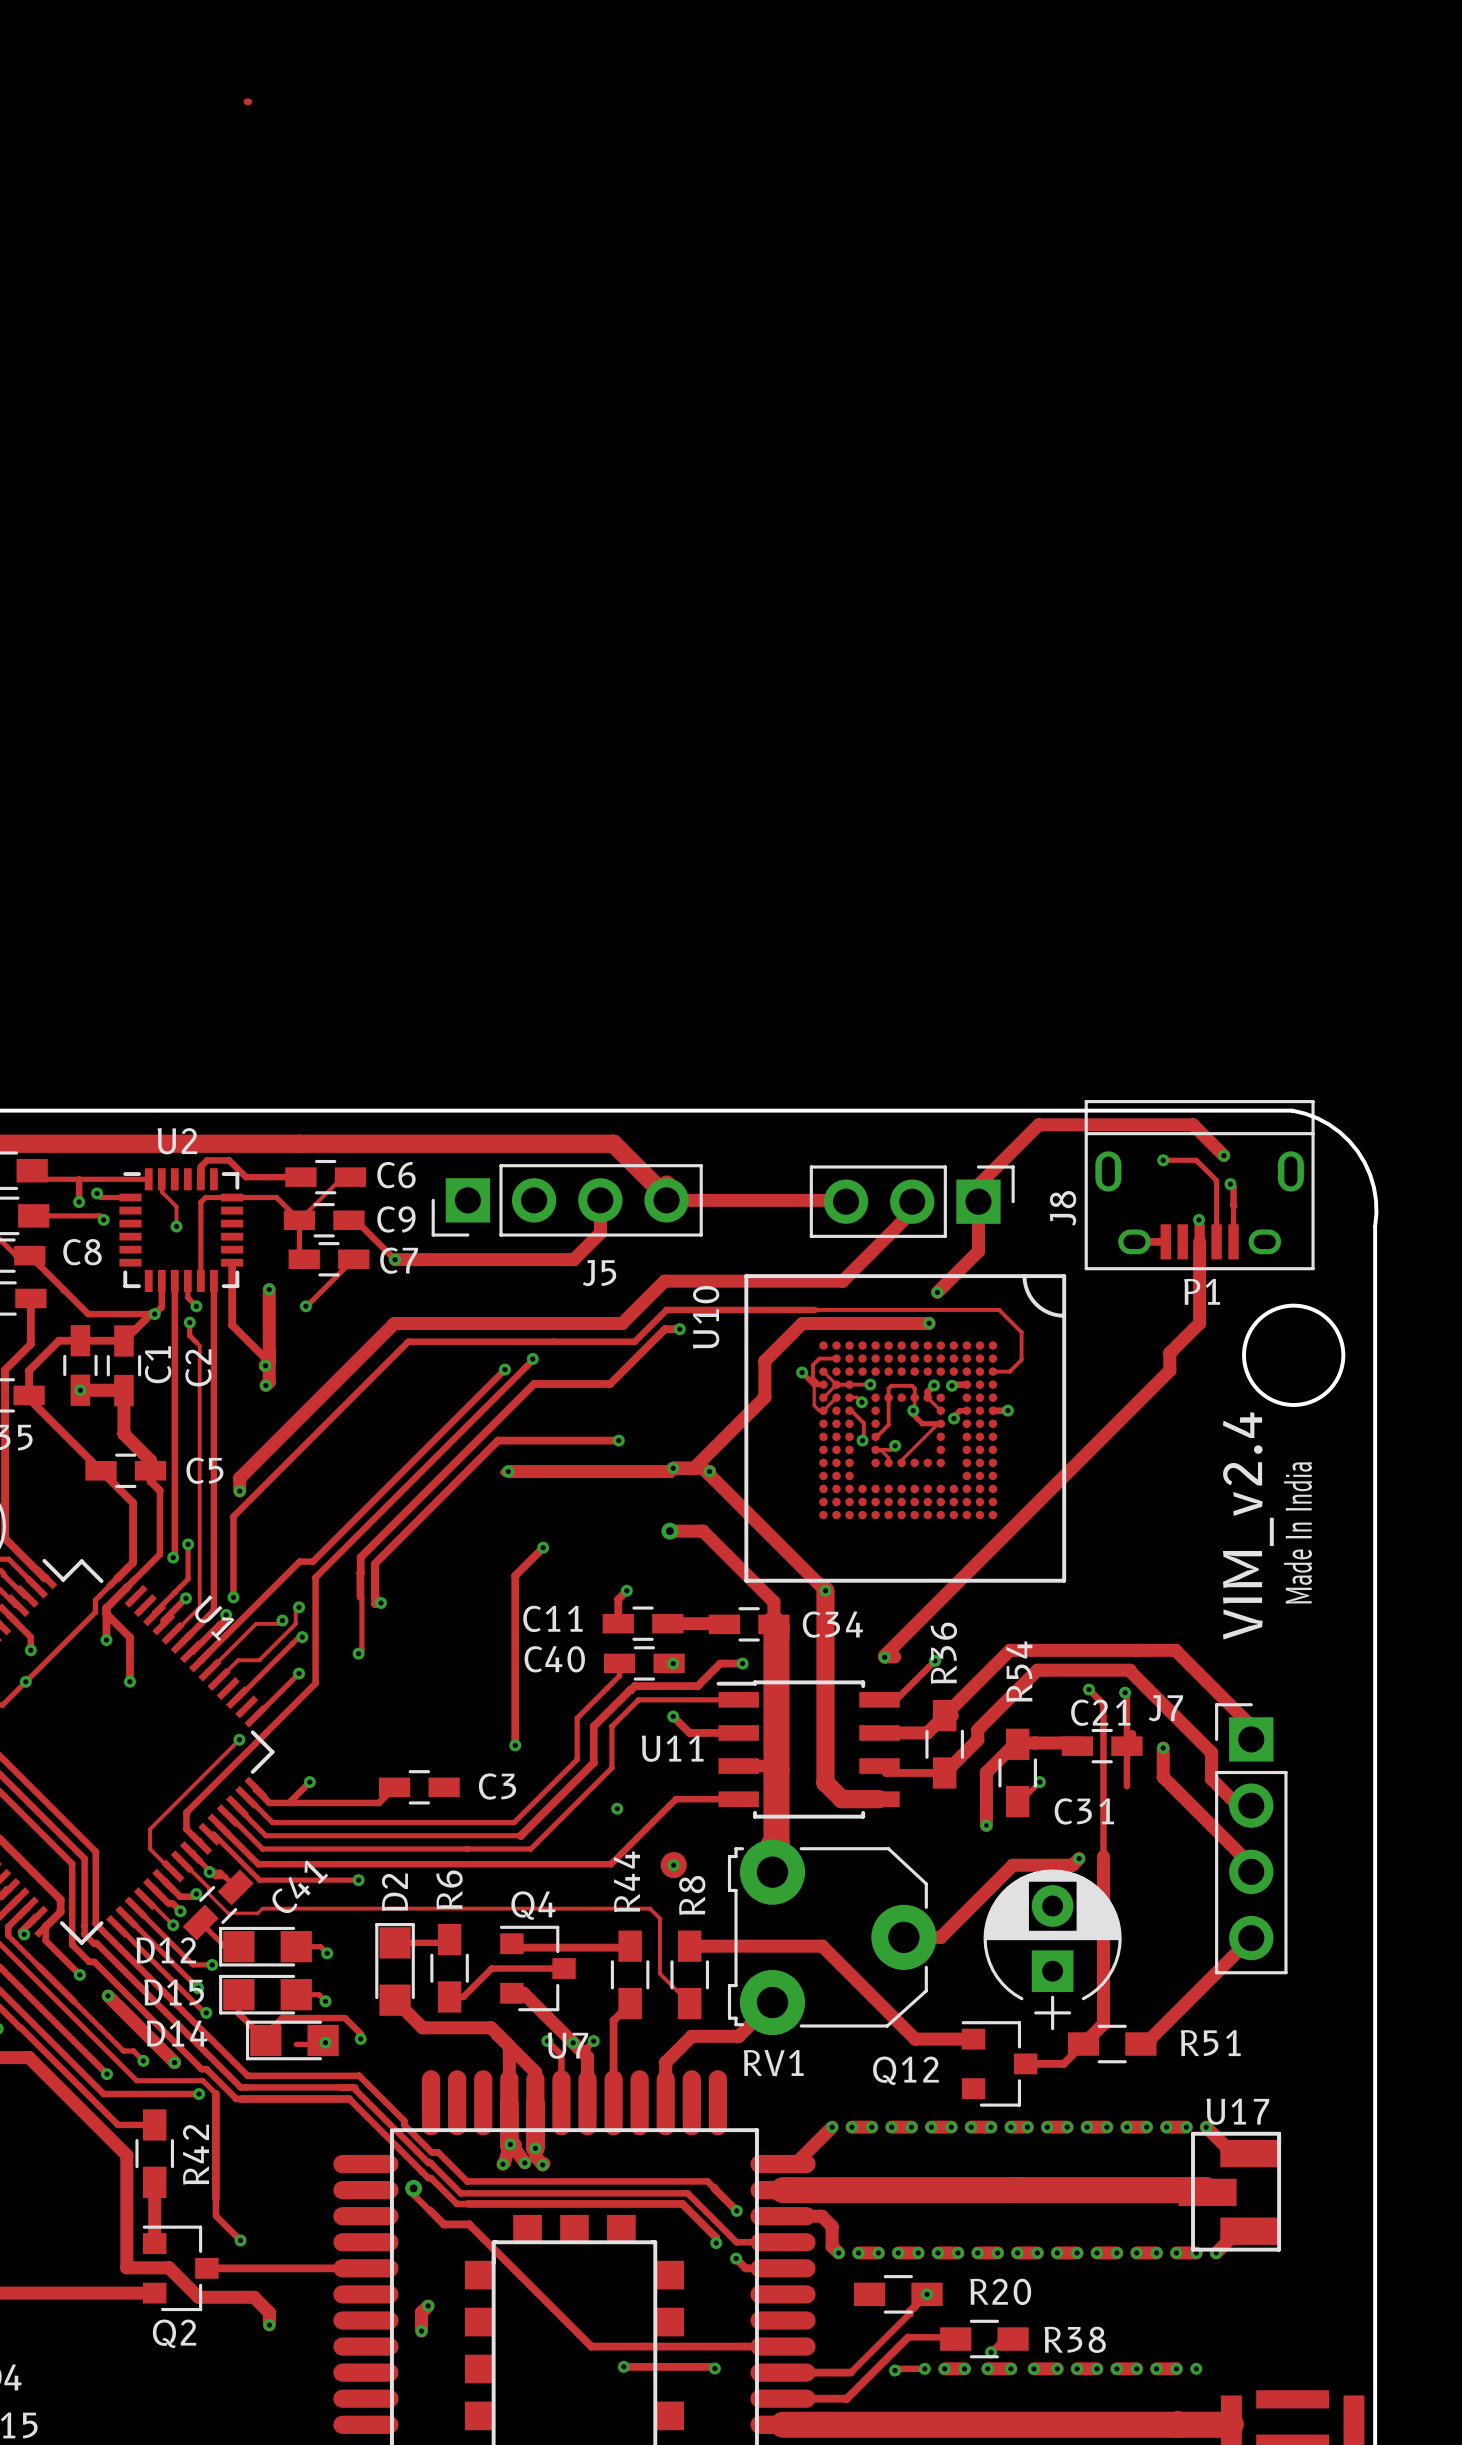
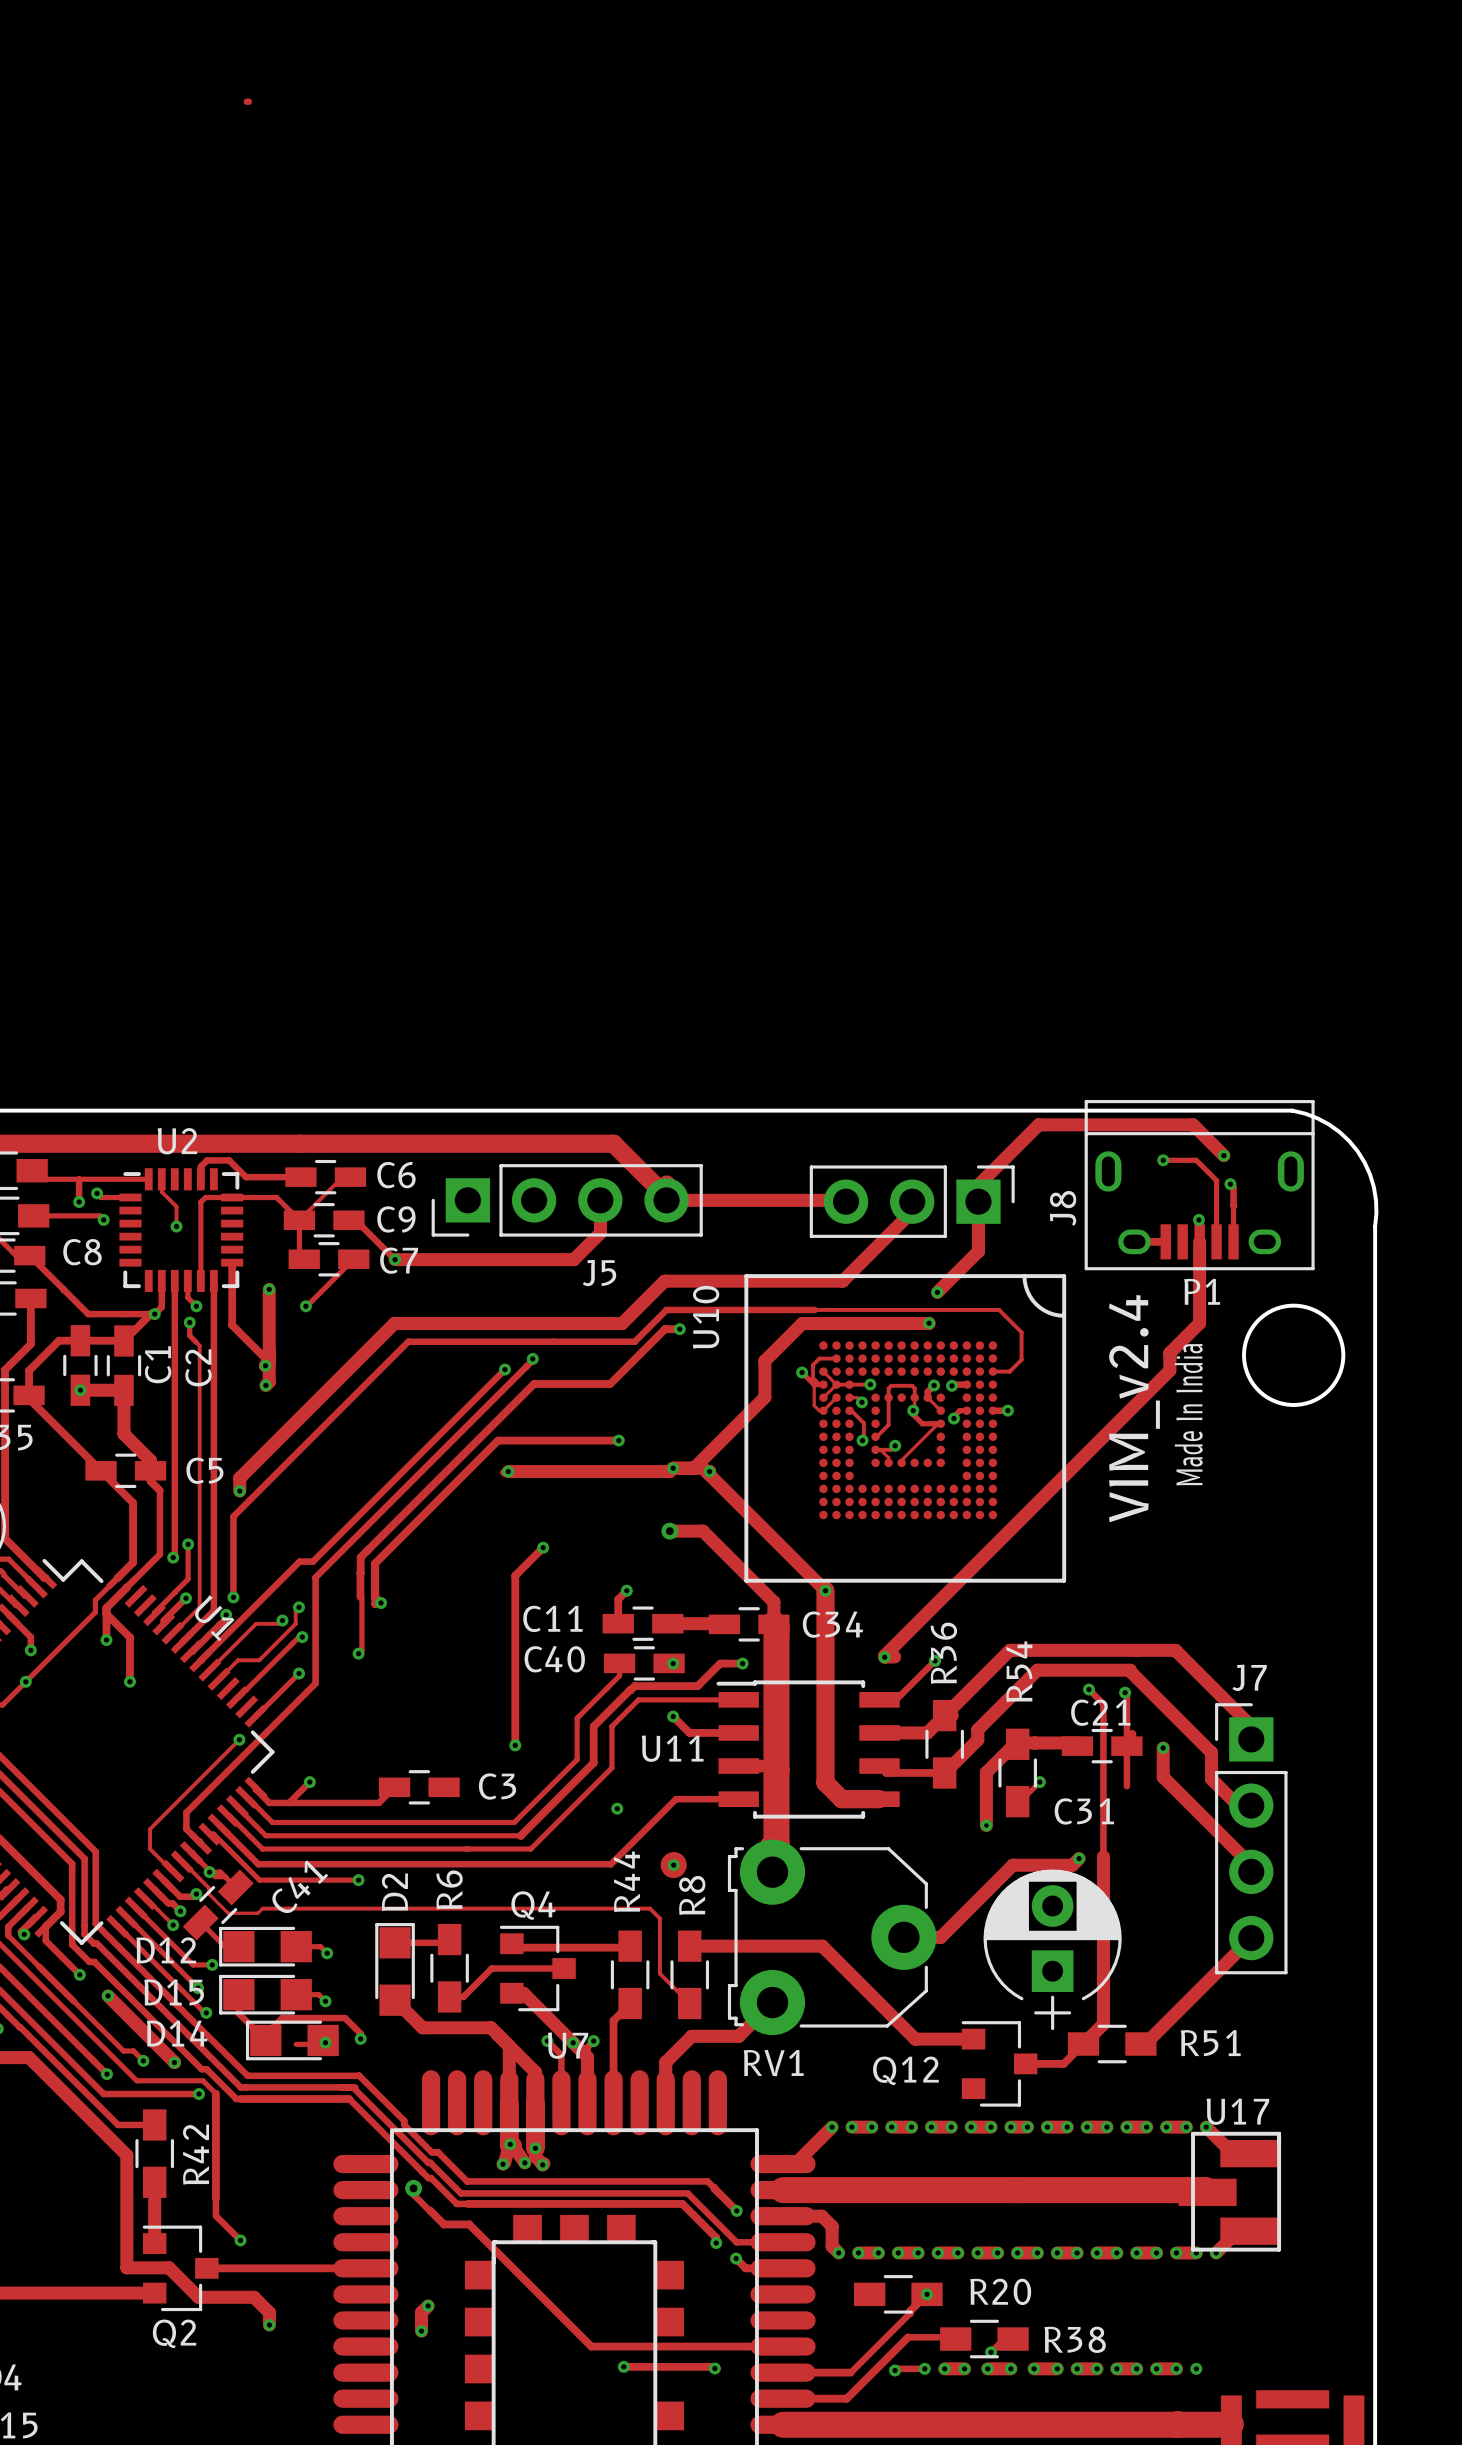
text position: VIM_v2.4 (1248, 1525) -> VIM_v2.4 (1134, 1408)
text position: Made In India (1297, 1532) -> Made In India (1188, 1414)
J7 name position: J7 (1165, 1708) -> J7 (1249, 1677)

